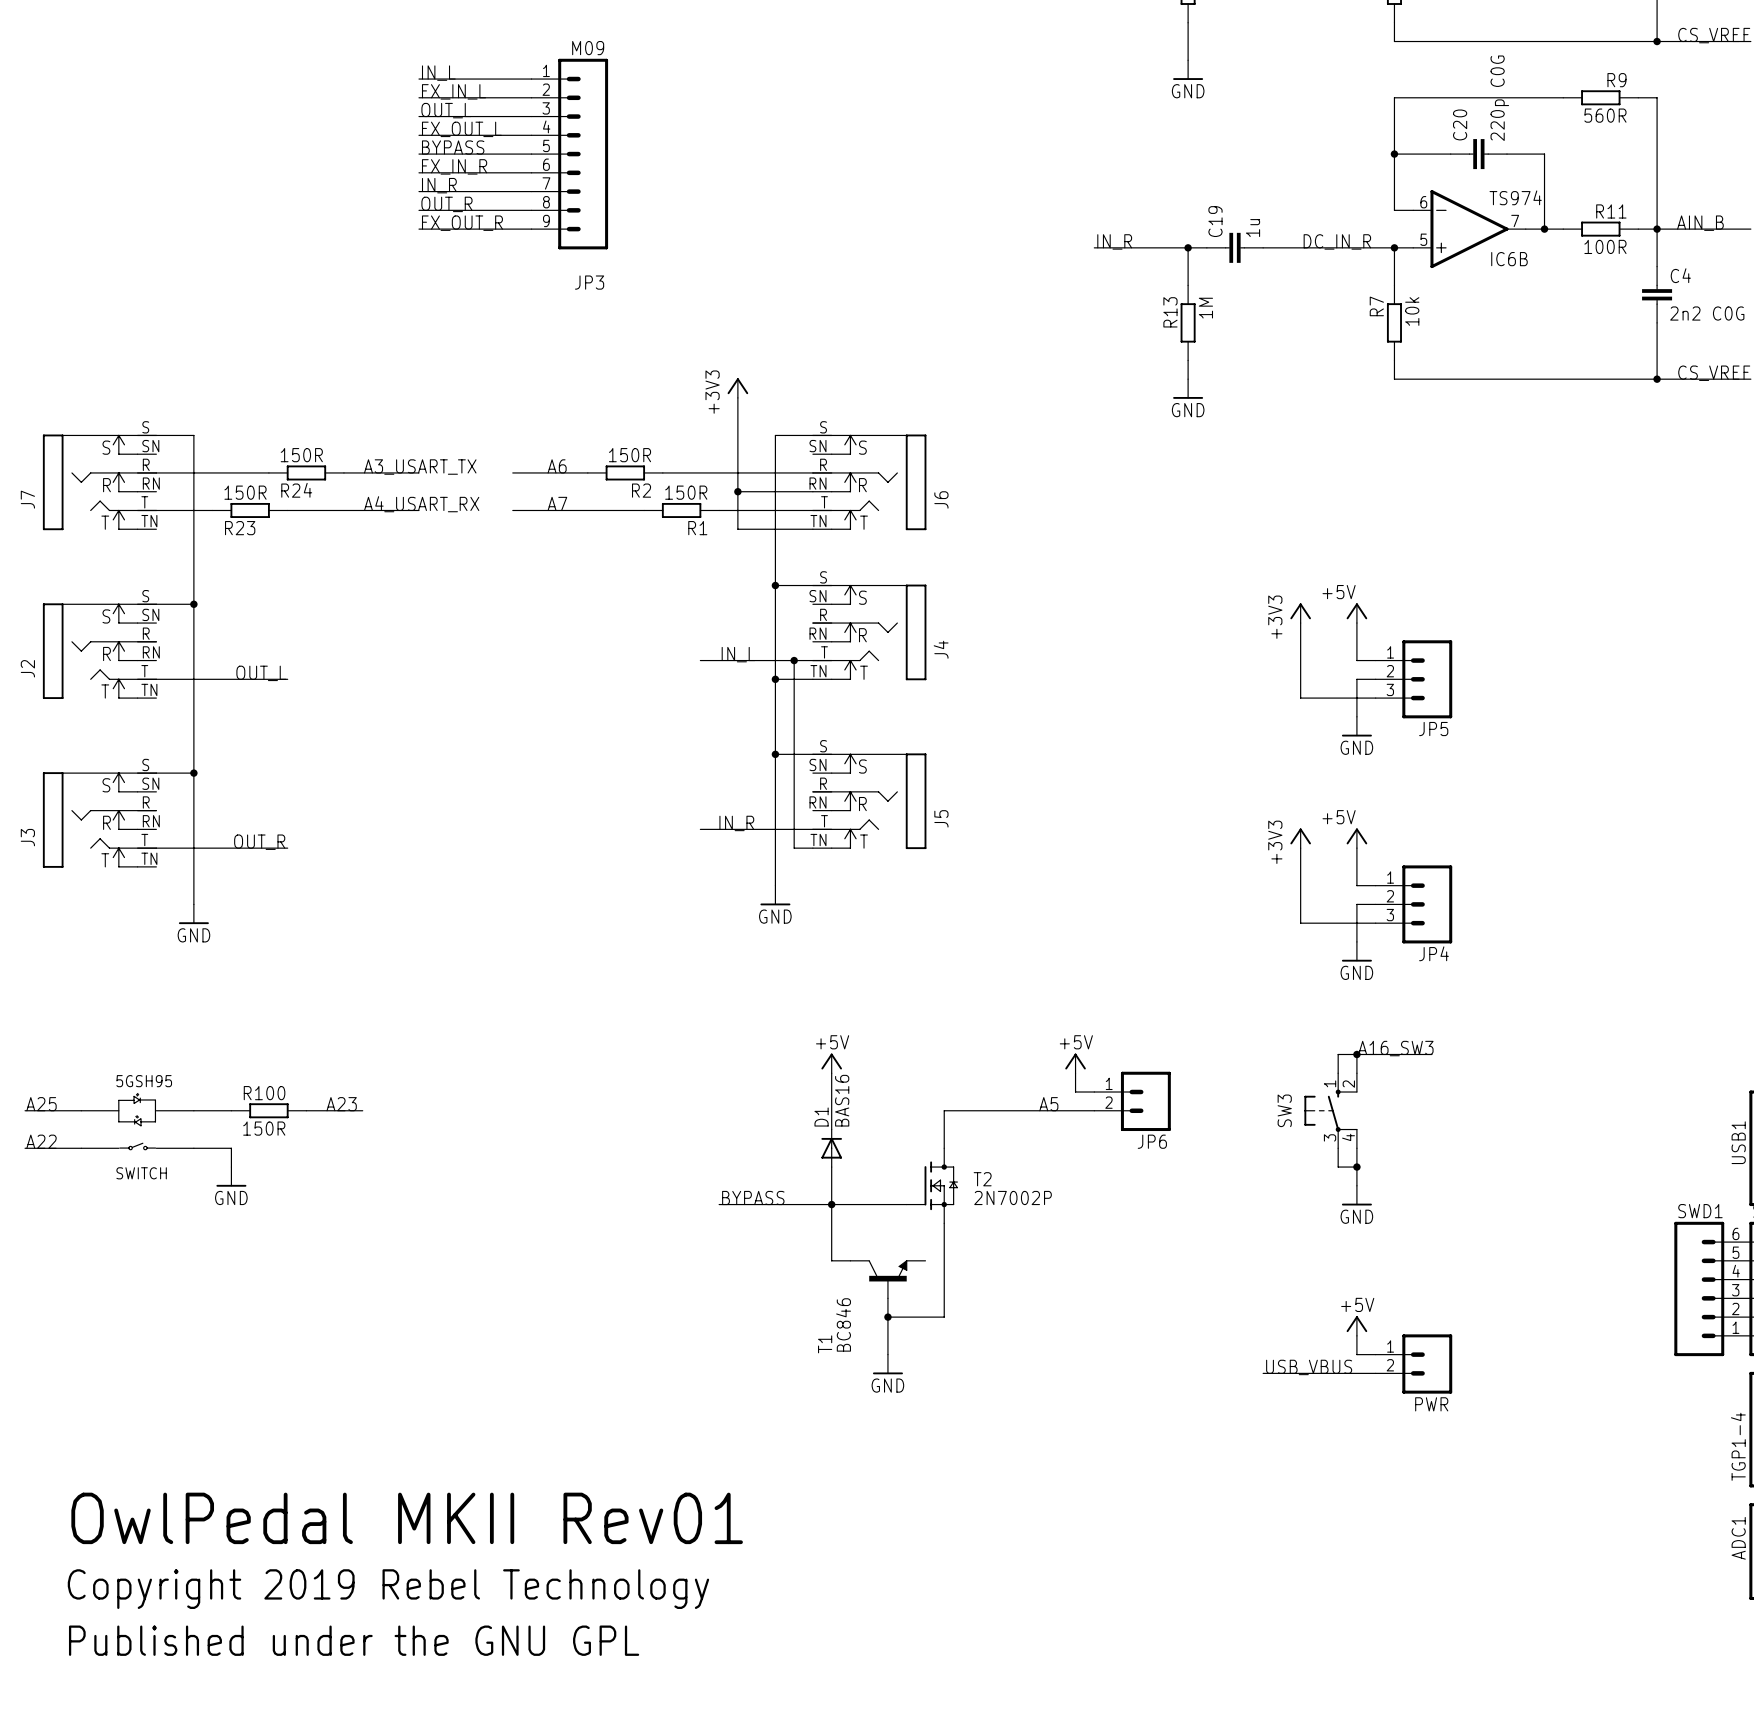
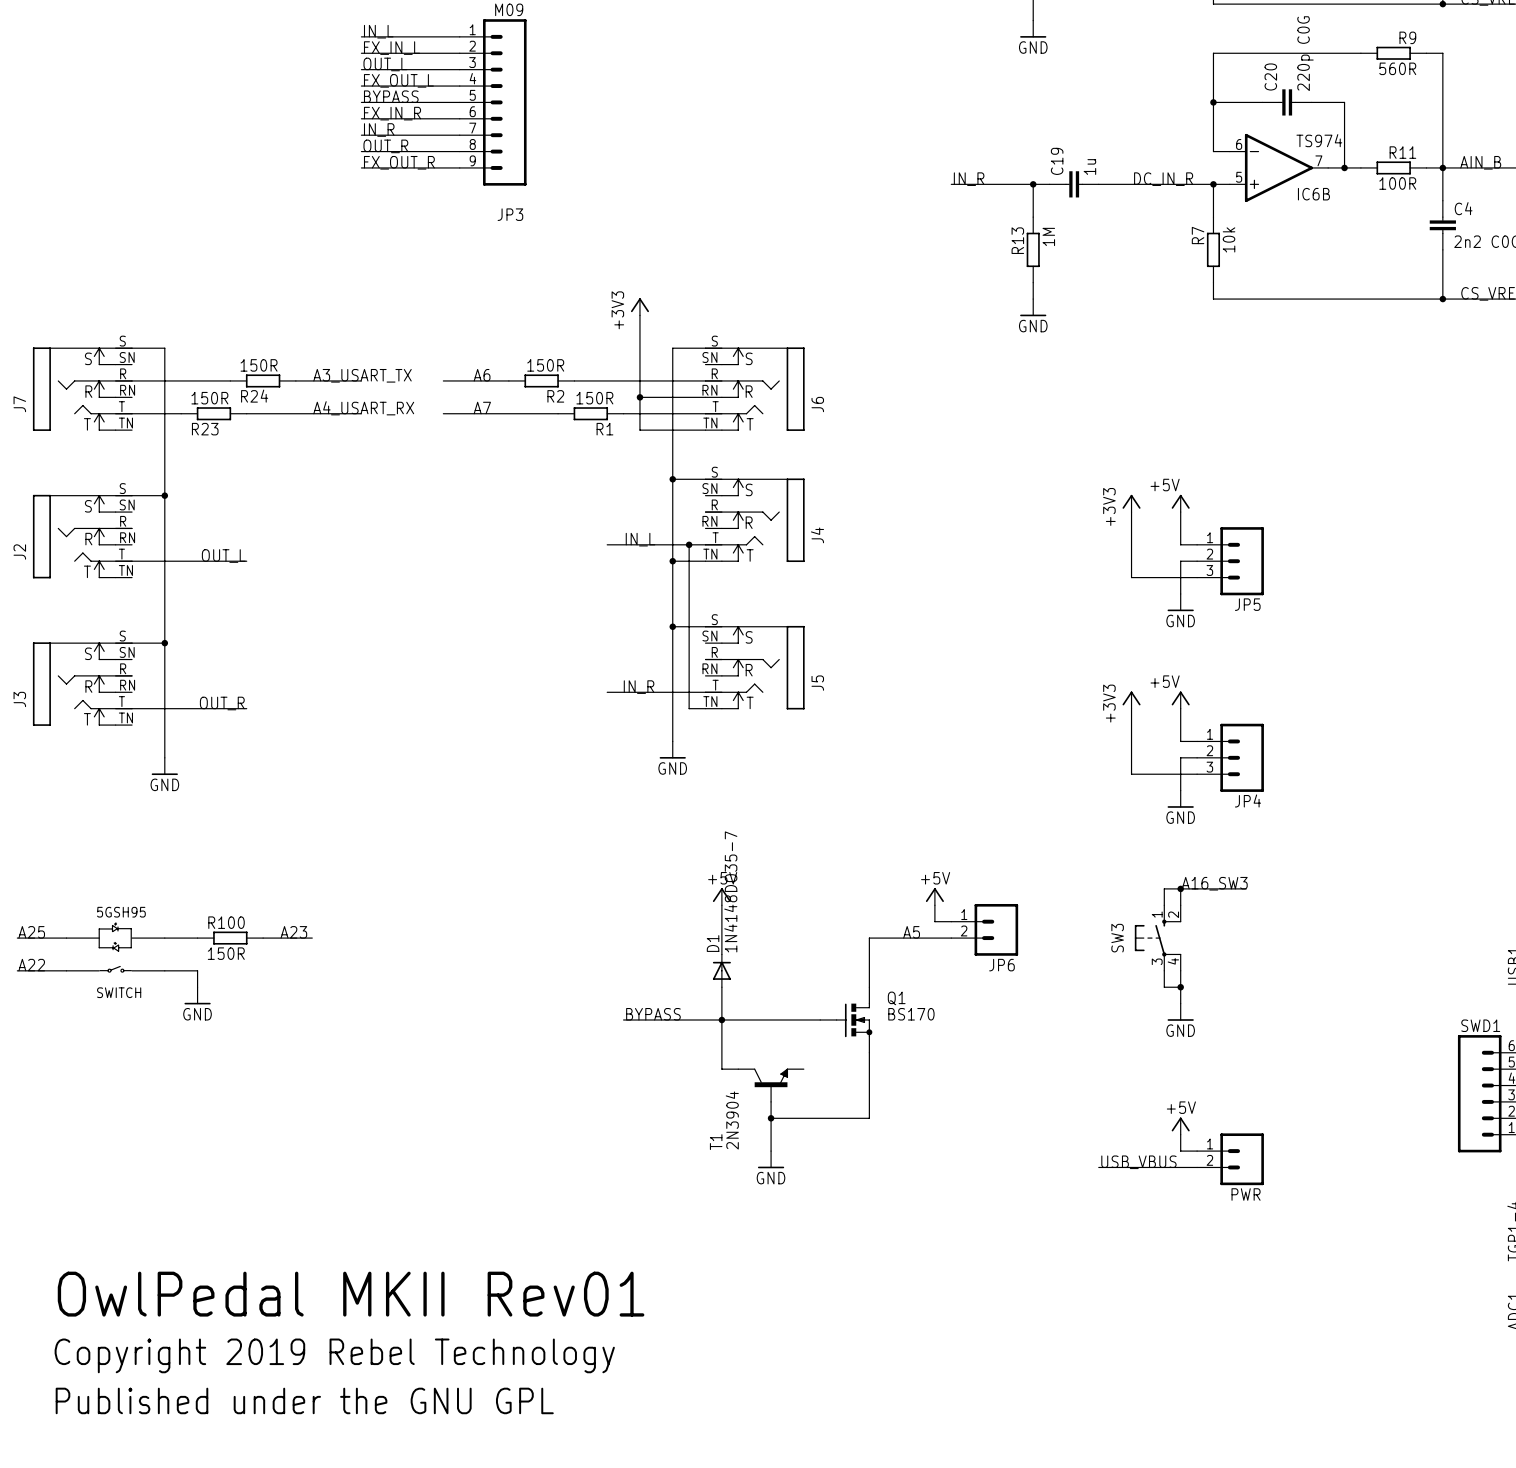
D1 value: BAS16 (842, 1100) -> 1N4148DO35-7 (730, 891)
wire: (1000, 1110) (944, 1110) (944, 1148) -> (869, 938) (869, 987)
T2: 2N7002P (932, 1185) -> none
Q1: none -> BS170 (846, 1020)
wire: (944, 1223) (944, 1317) -> (869, 1052) (869, 1118) (820, 1118)
T1 value: BC846 (843, 1324) -> 2N3904 (732, 1120)

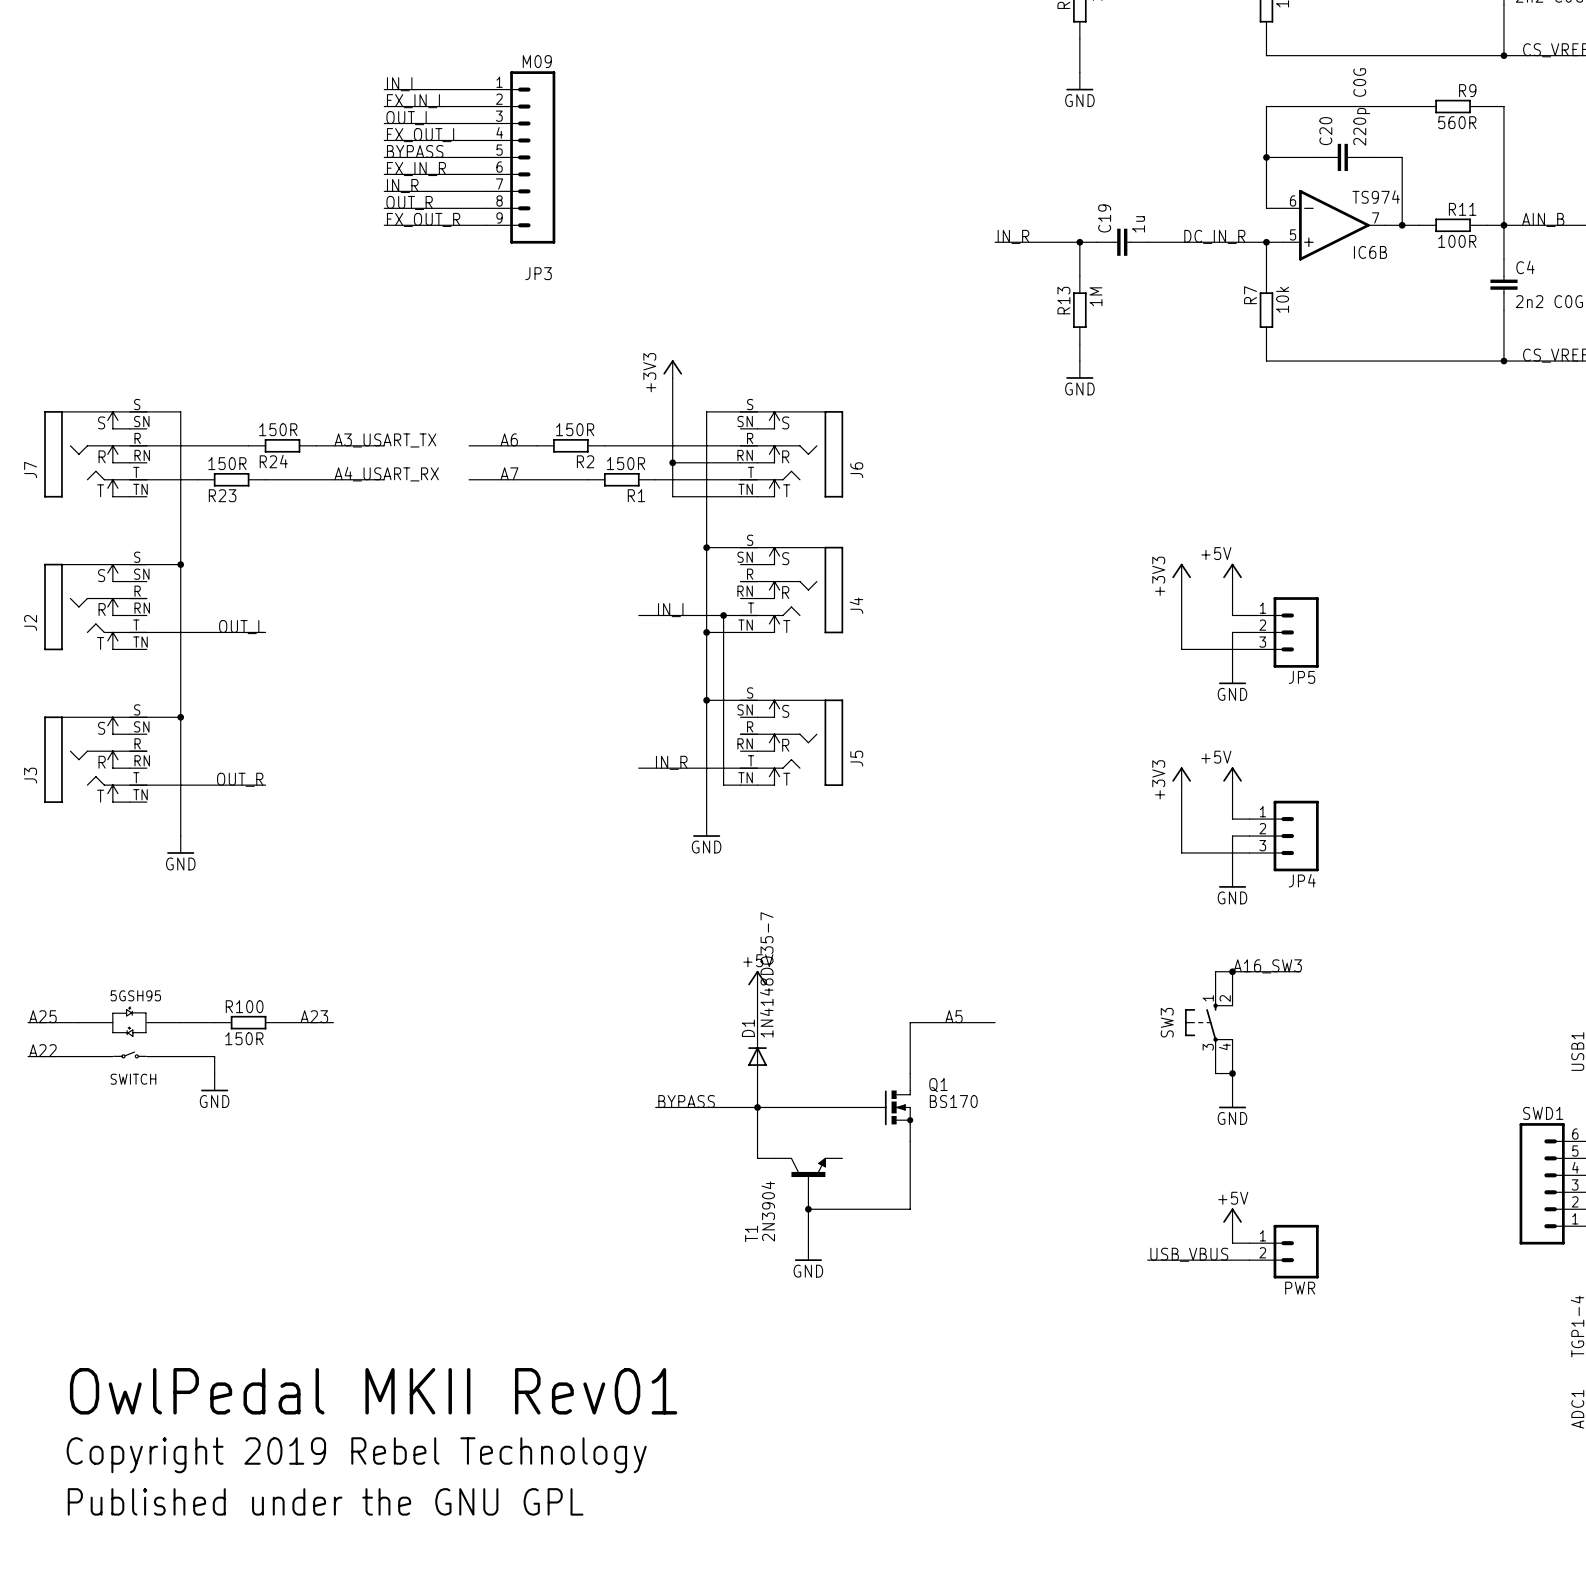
power symbol: +5V (934, 896) -> none
wire: (934, 905) (934, 921) (951, 921) -> none
JP6: (984, 929) -> none

